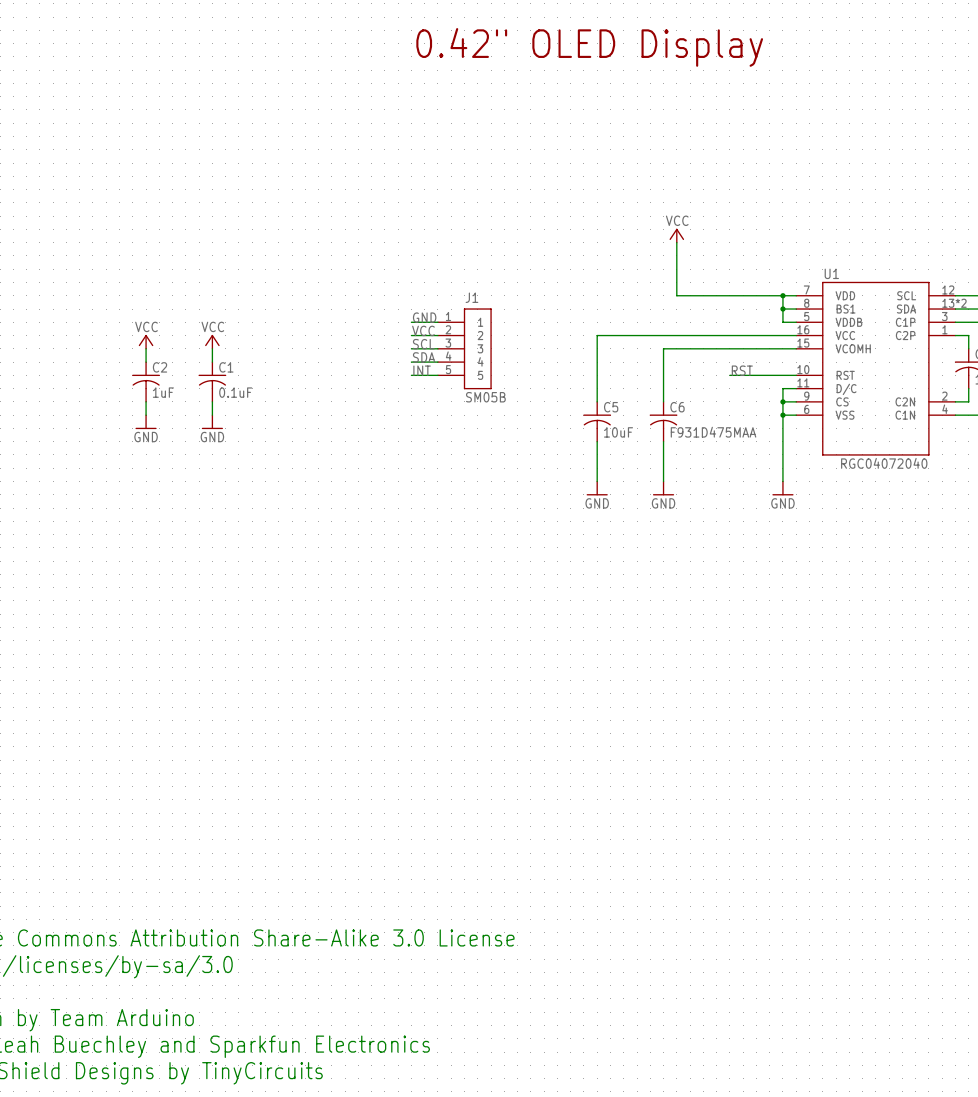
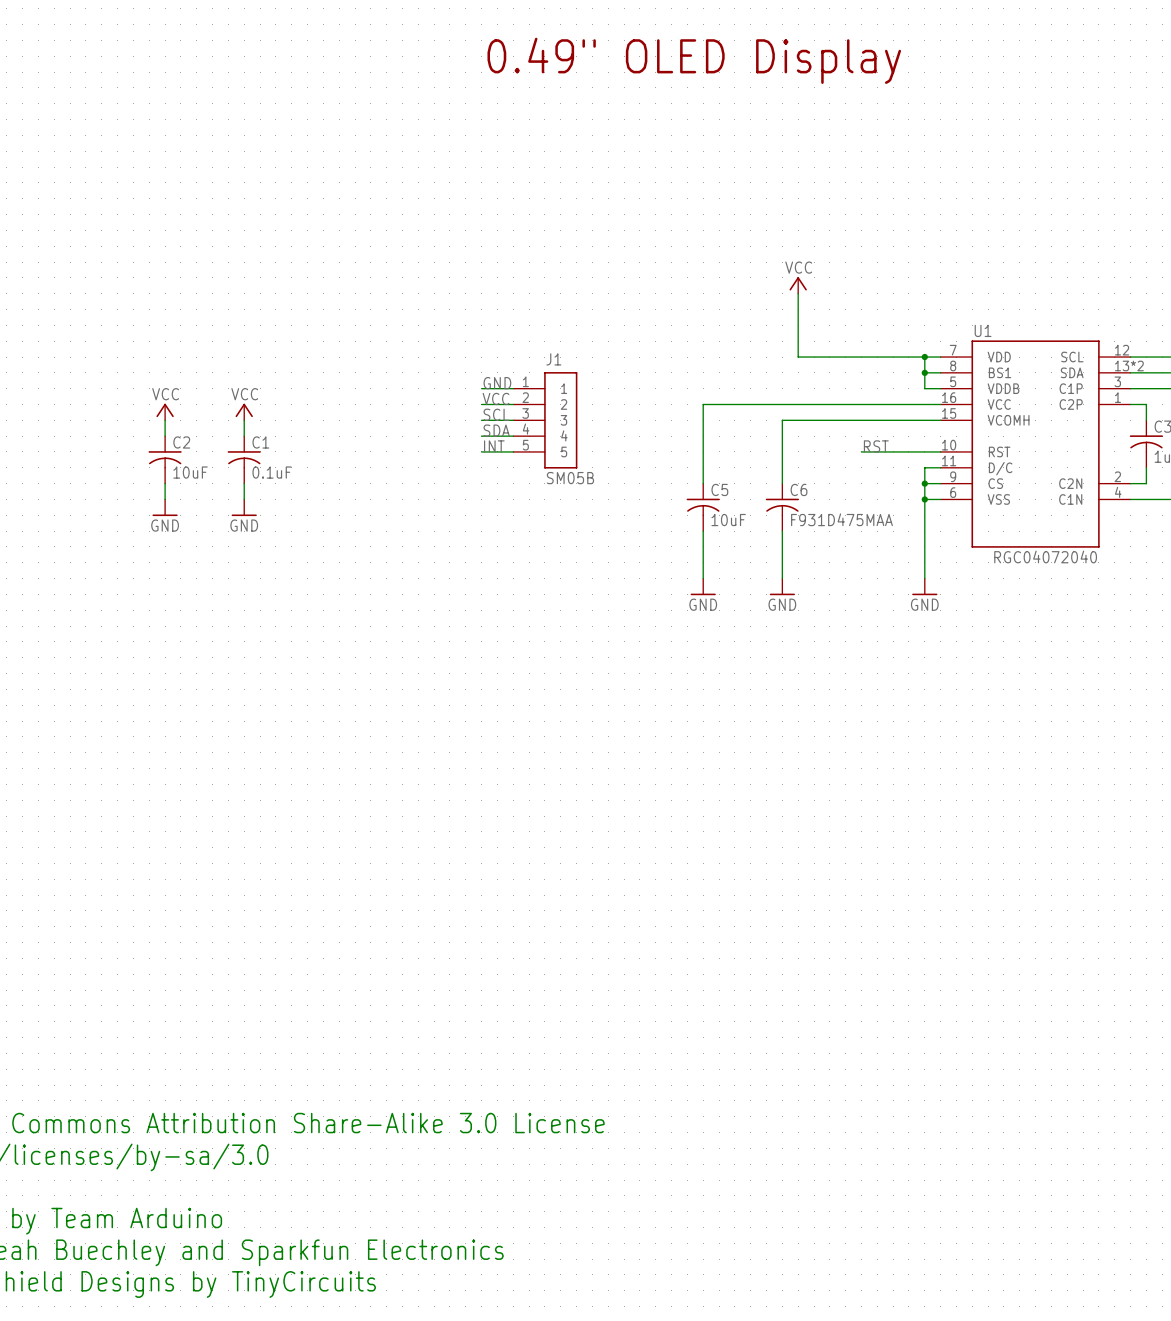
text: 0.42" OLED Display (589, 47) -> 0.49" OLED Display (694, 60)
C2 value: 1uF (163, 392) -> 10uF (190, 472)

